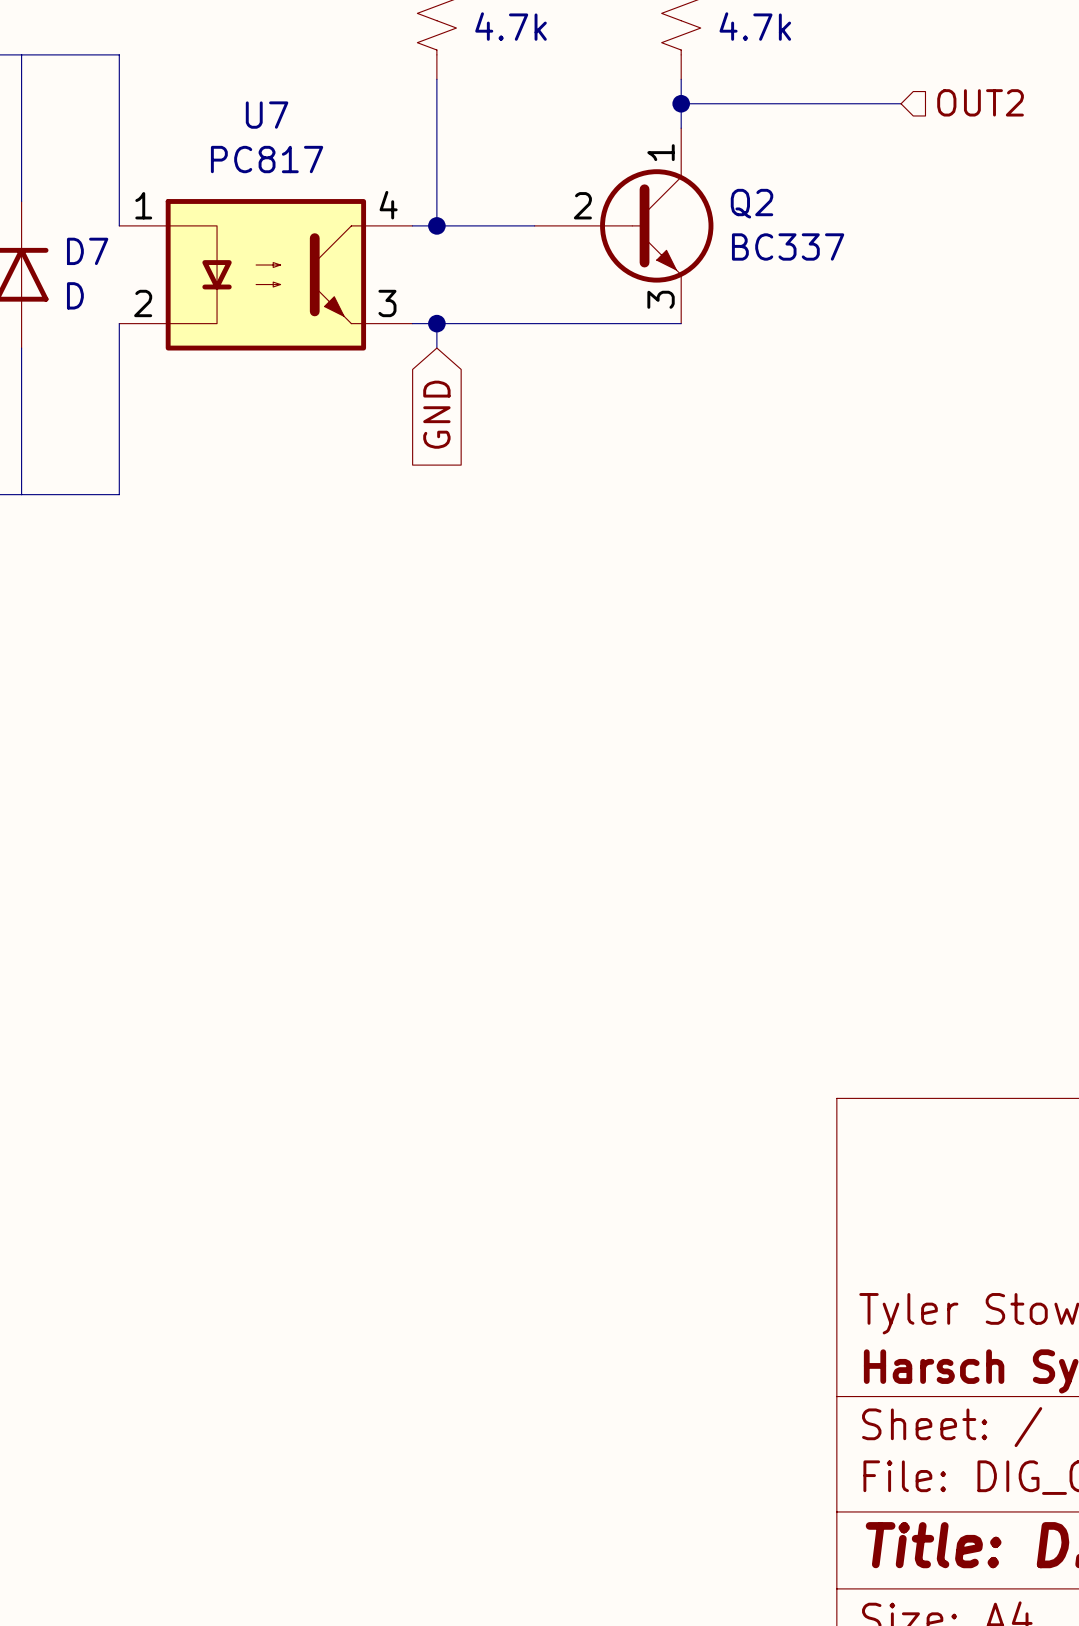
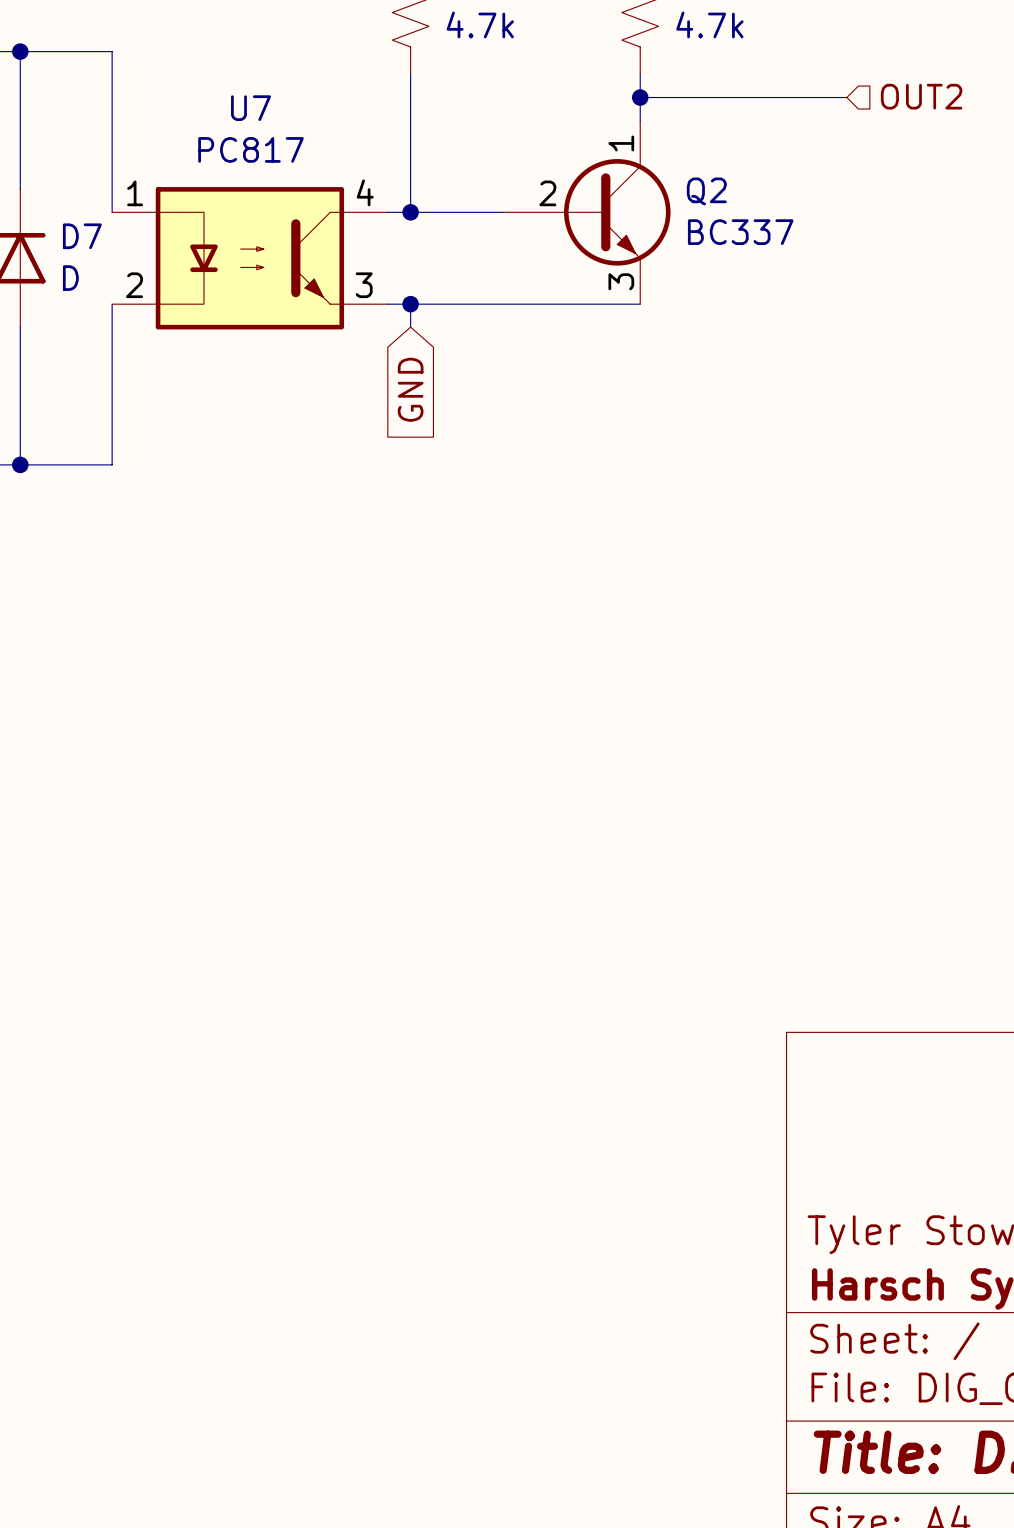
junction: none -> (20, 51)
junction: none -> (20, 464)

